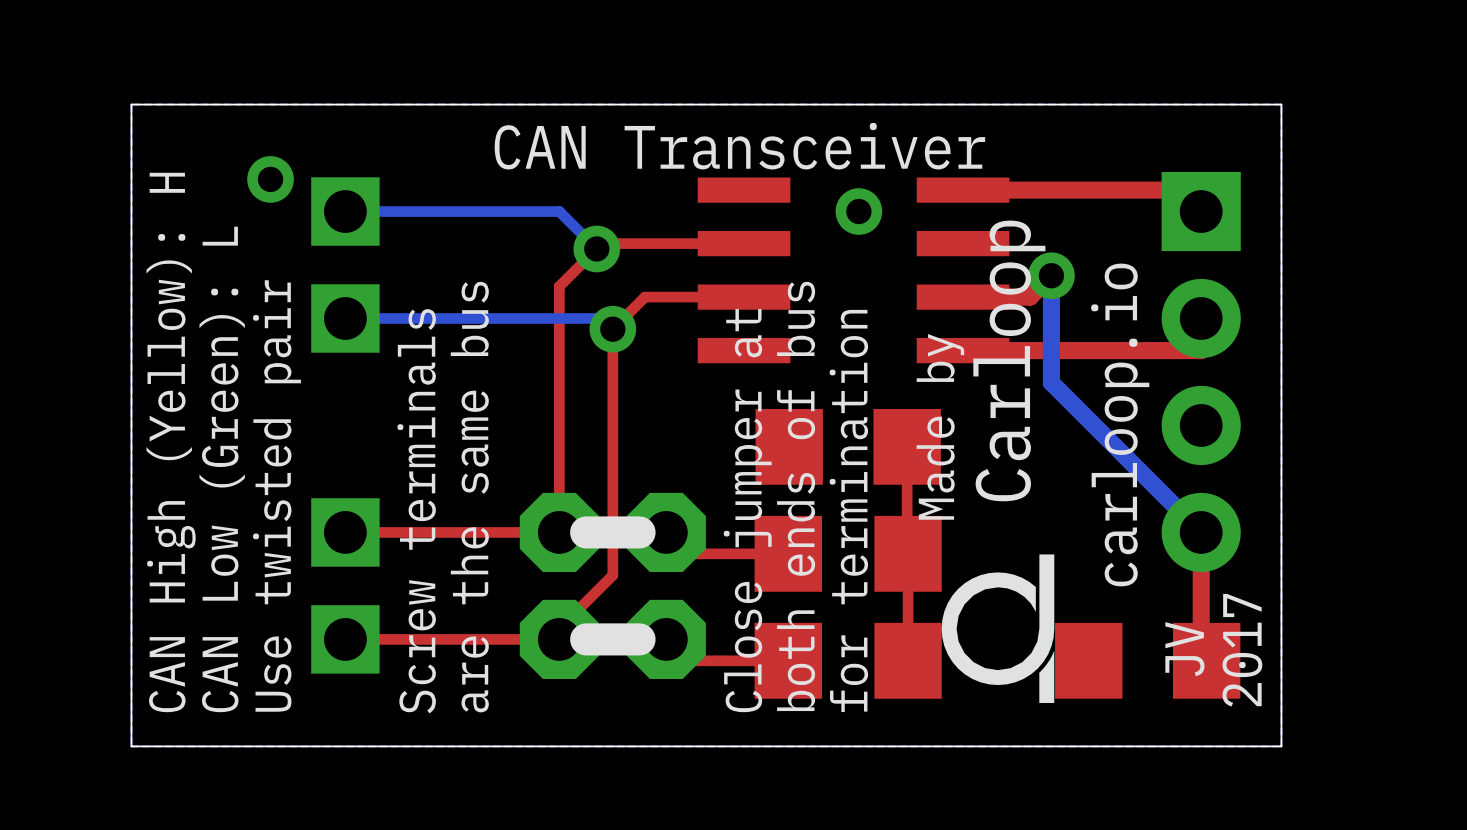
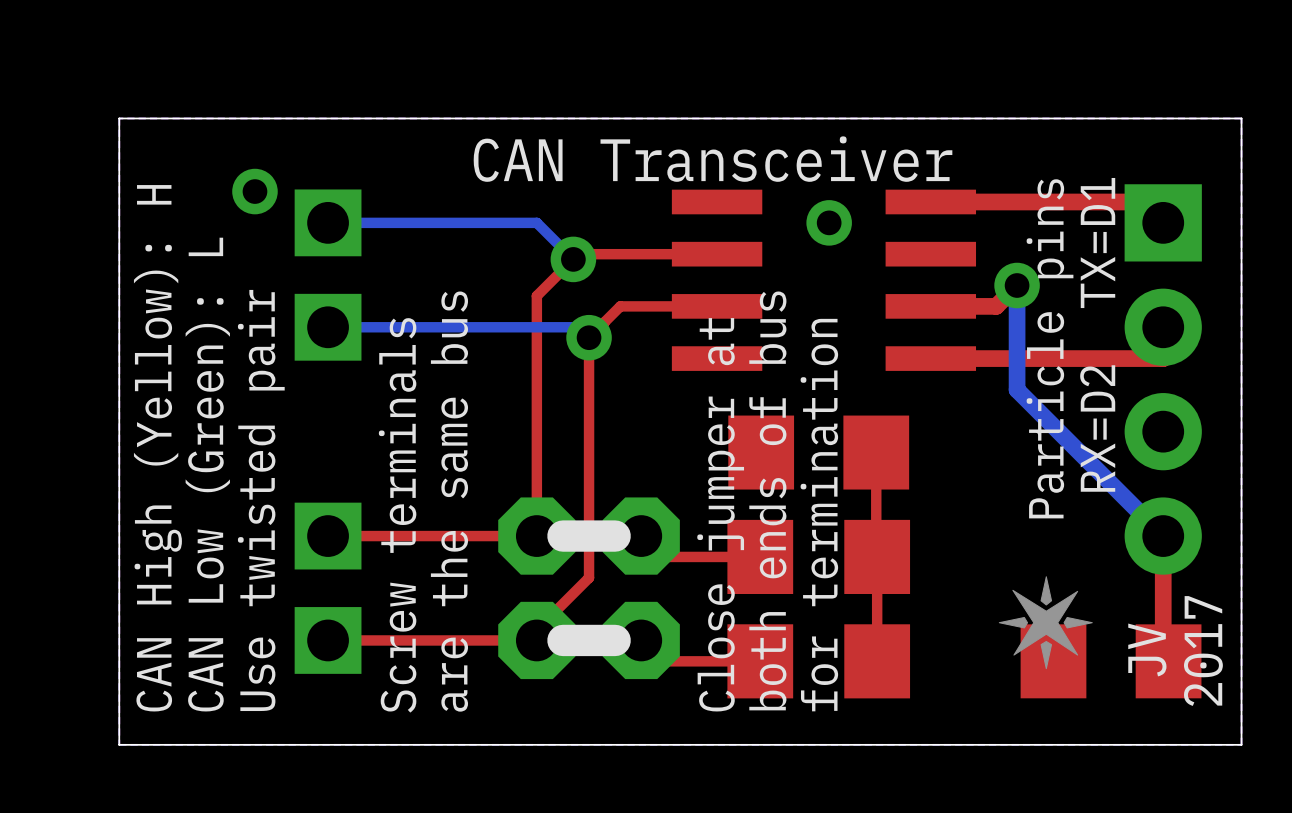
text: none -> RX=D2 TX=D1 (1097, 334)
text: none -> Particle pins (1050, 348)
text: Carloop (1009, 360) -> none
text: carloop.io (1120, 424) -> none
text: Made by (940, 426) -> none
drawing: [941, 554, 1055, 704] -> none
drawing: none -> [998, 576, 1093, 670]

